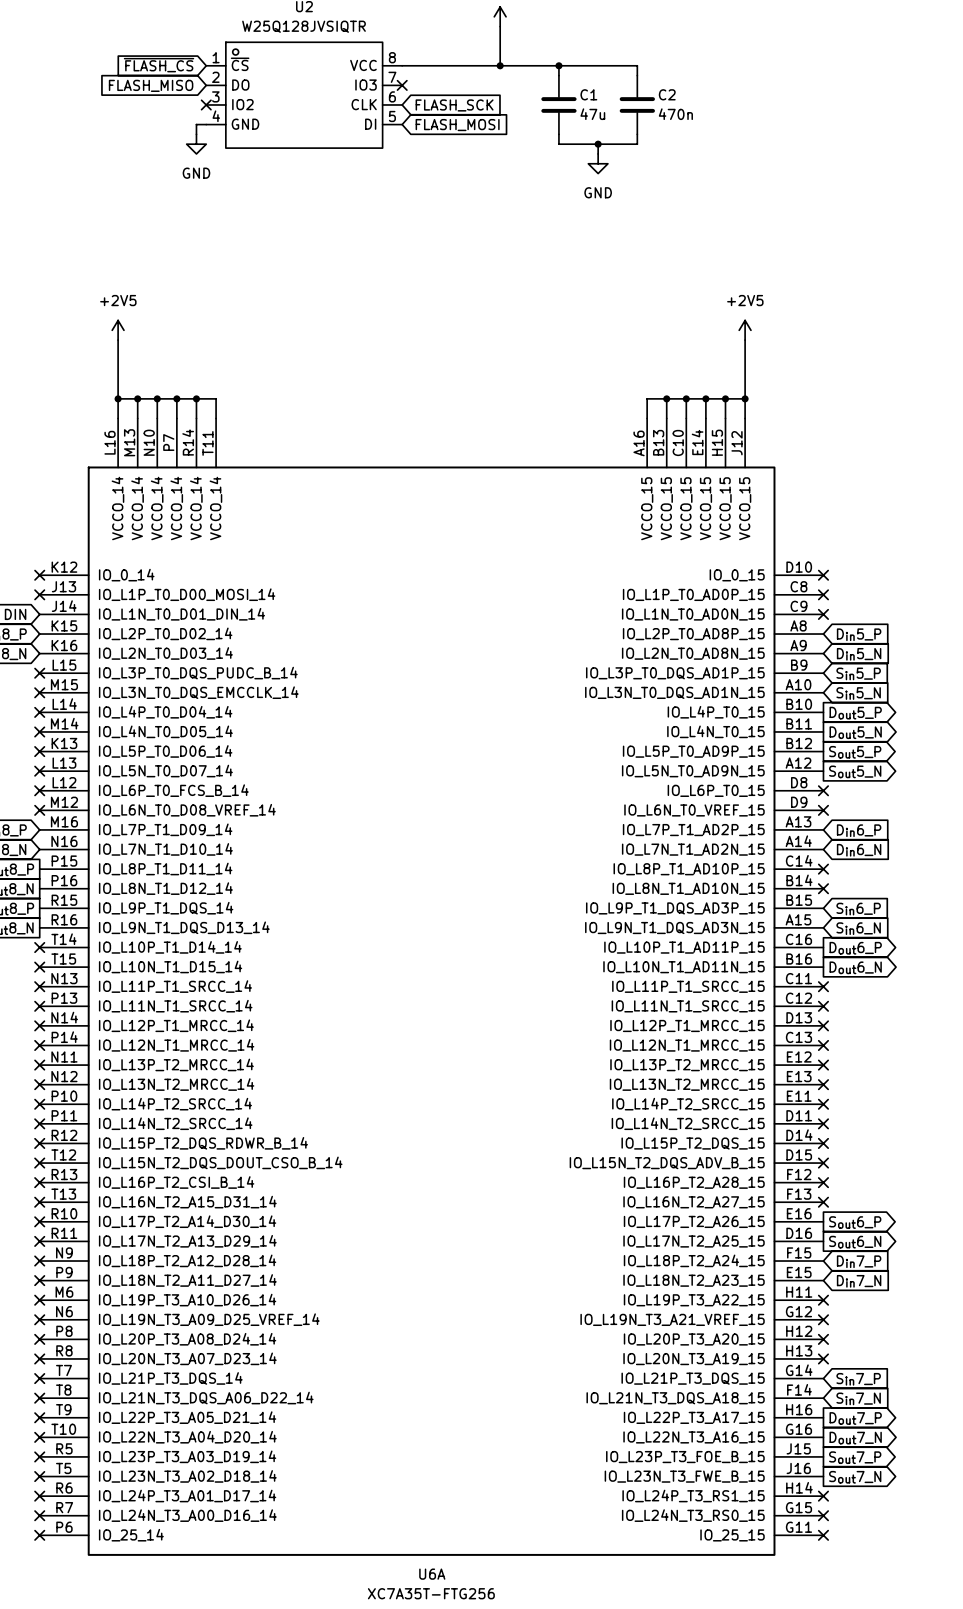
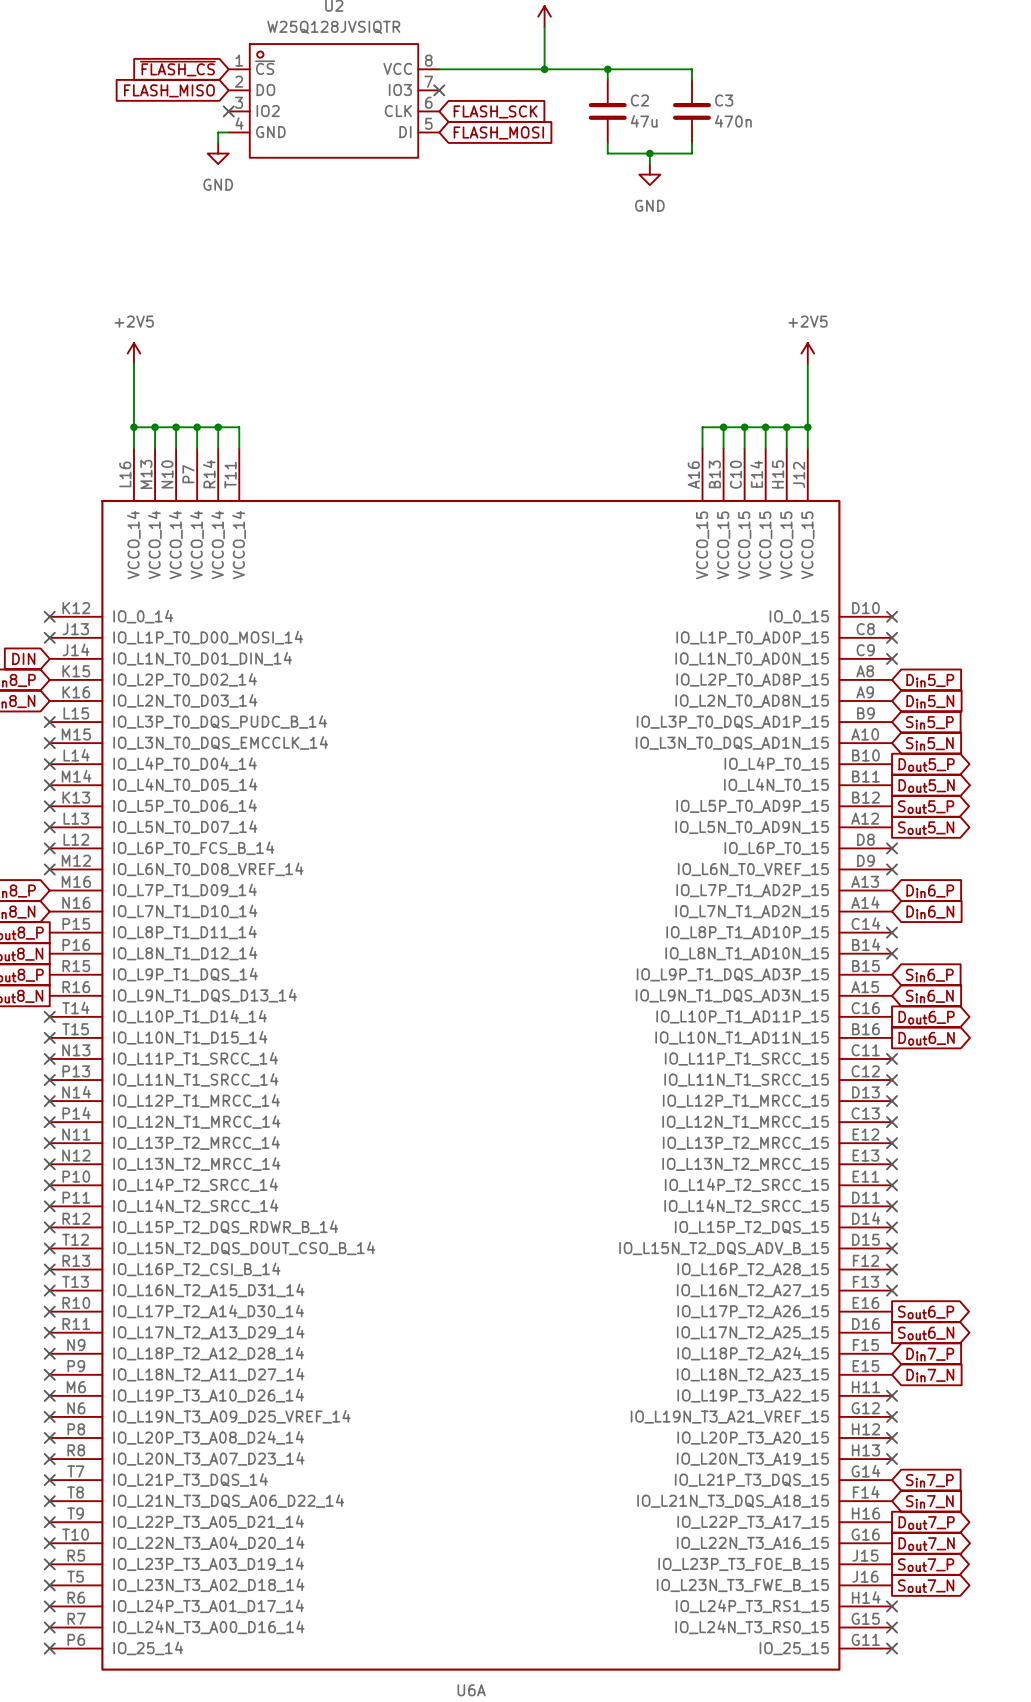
C1 name: C1 (588, 94) -> C2 (639, 100)
C2 name: C2 (667, 94) -> C3 (724, 100)

